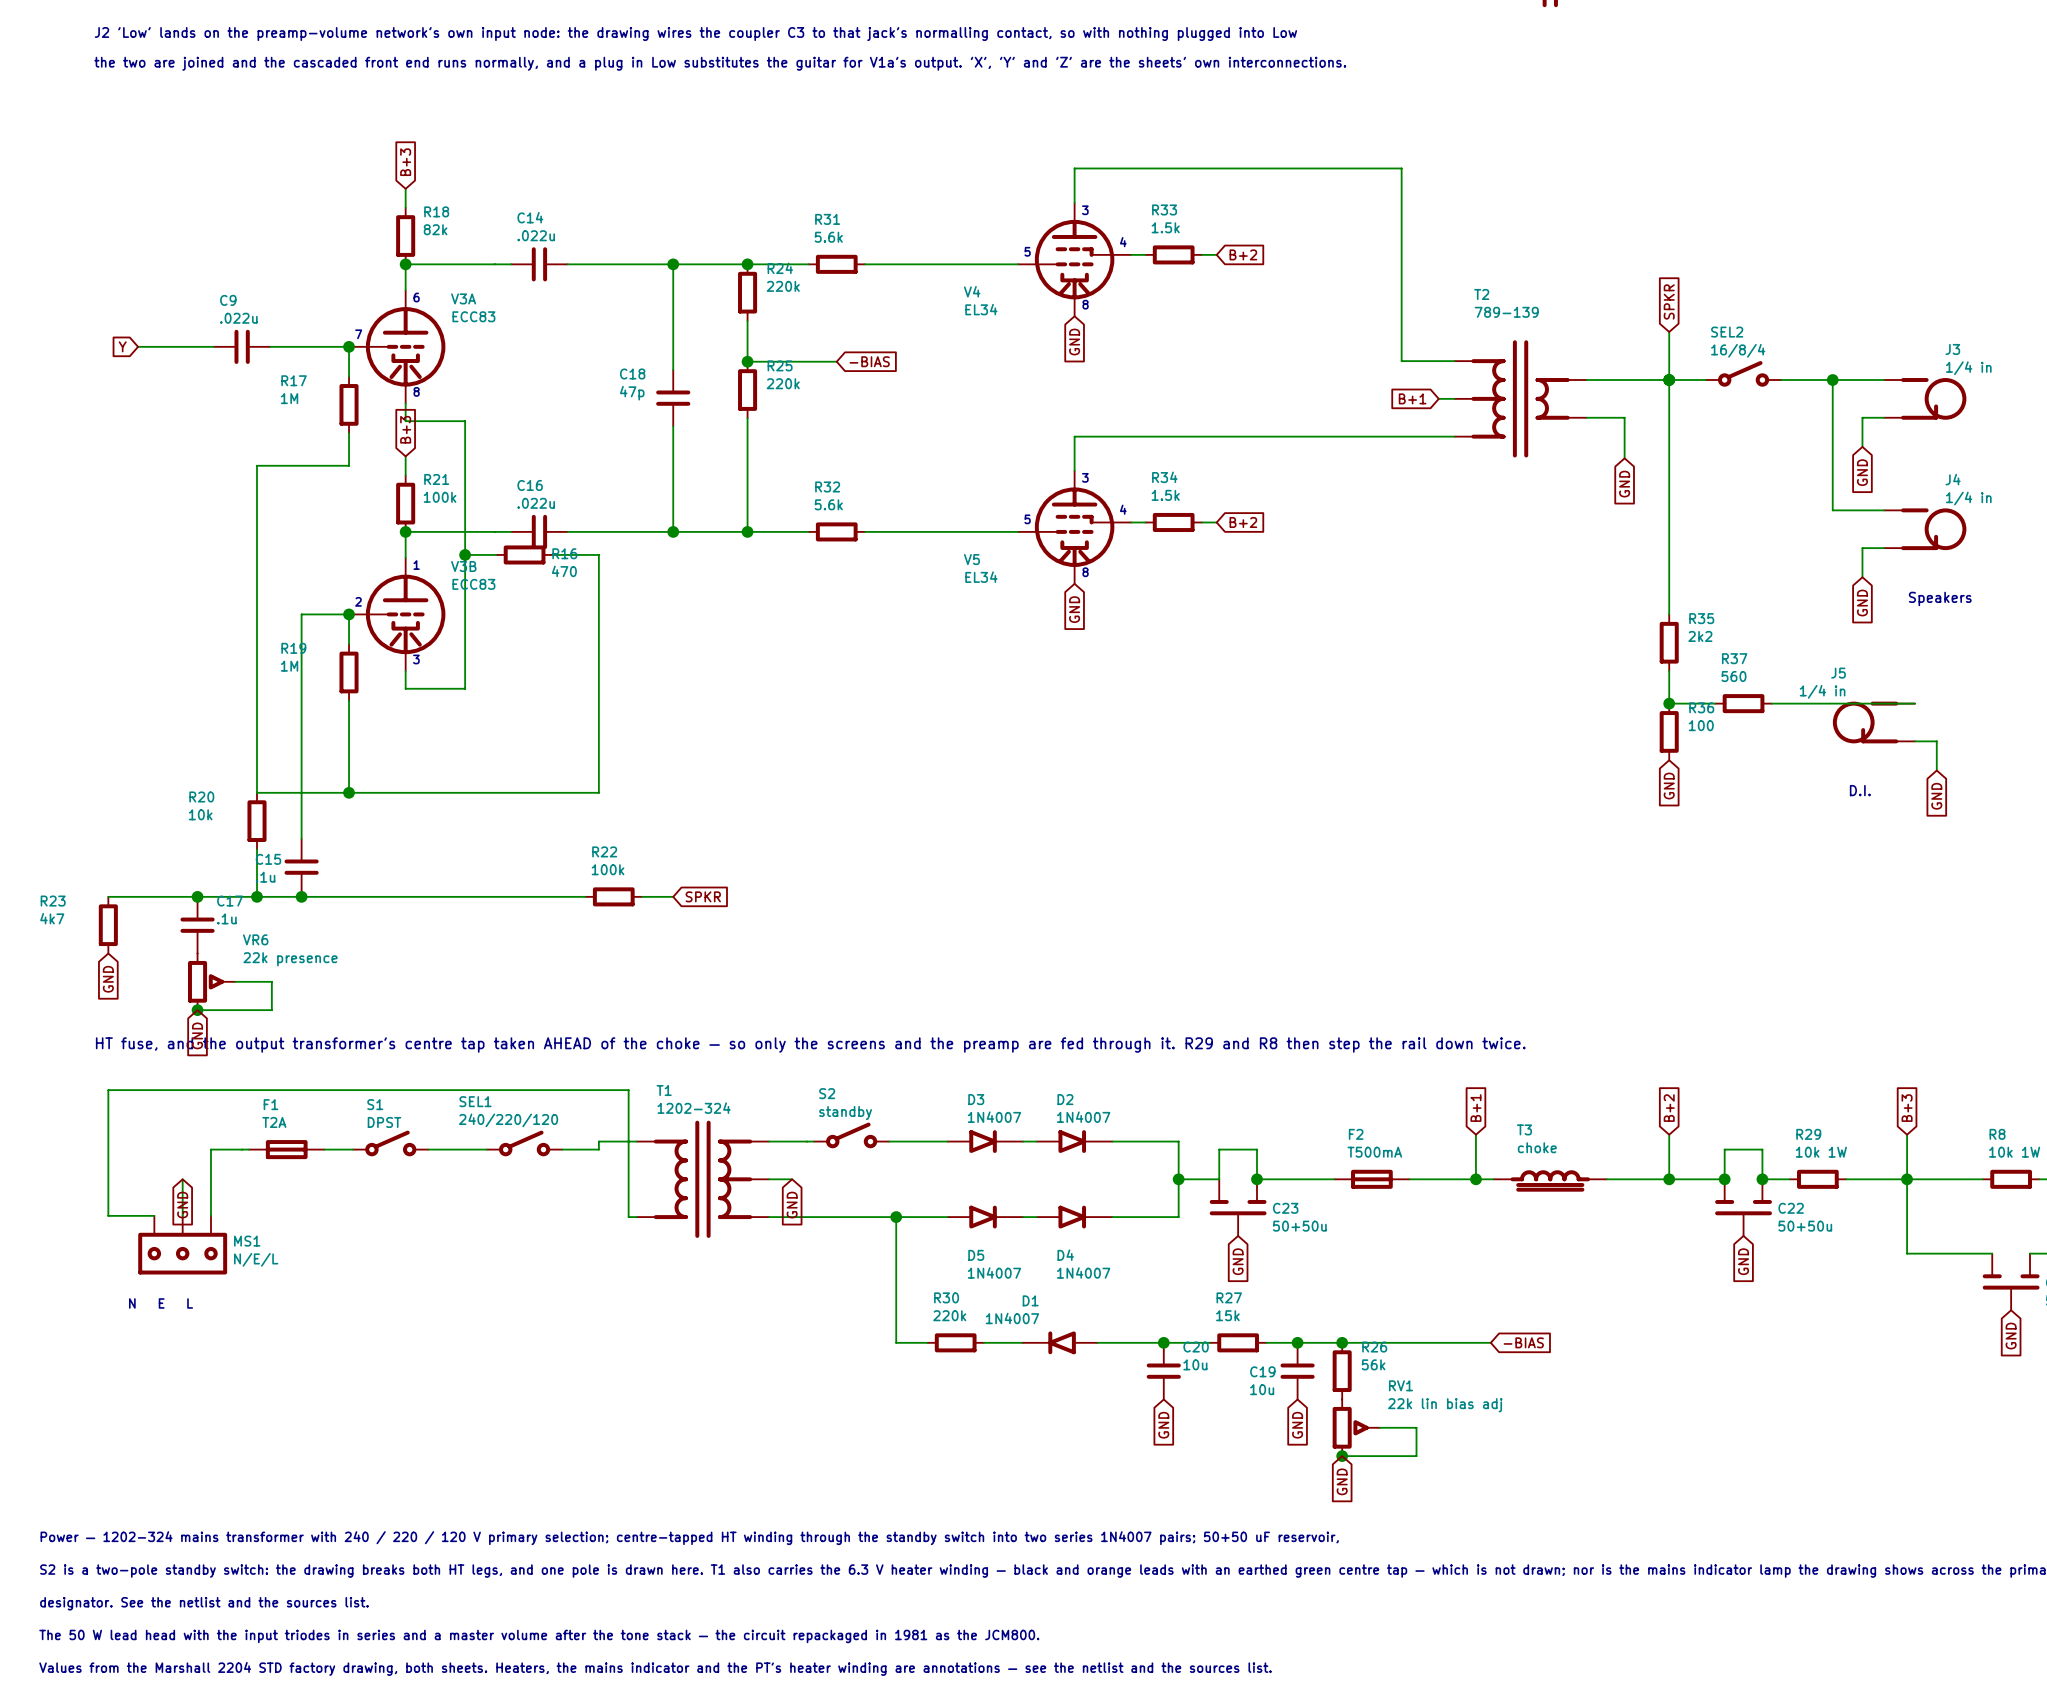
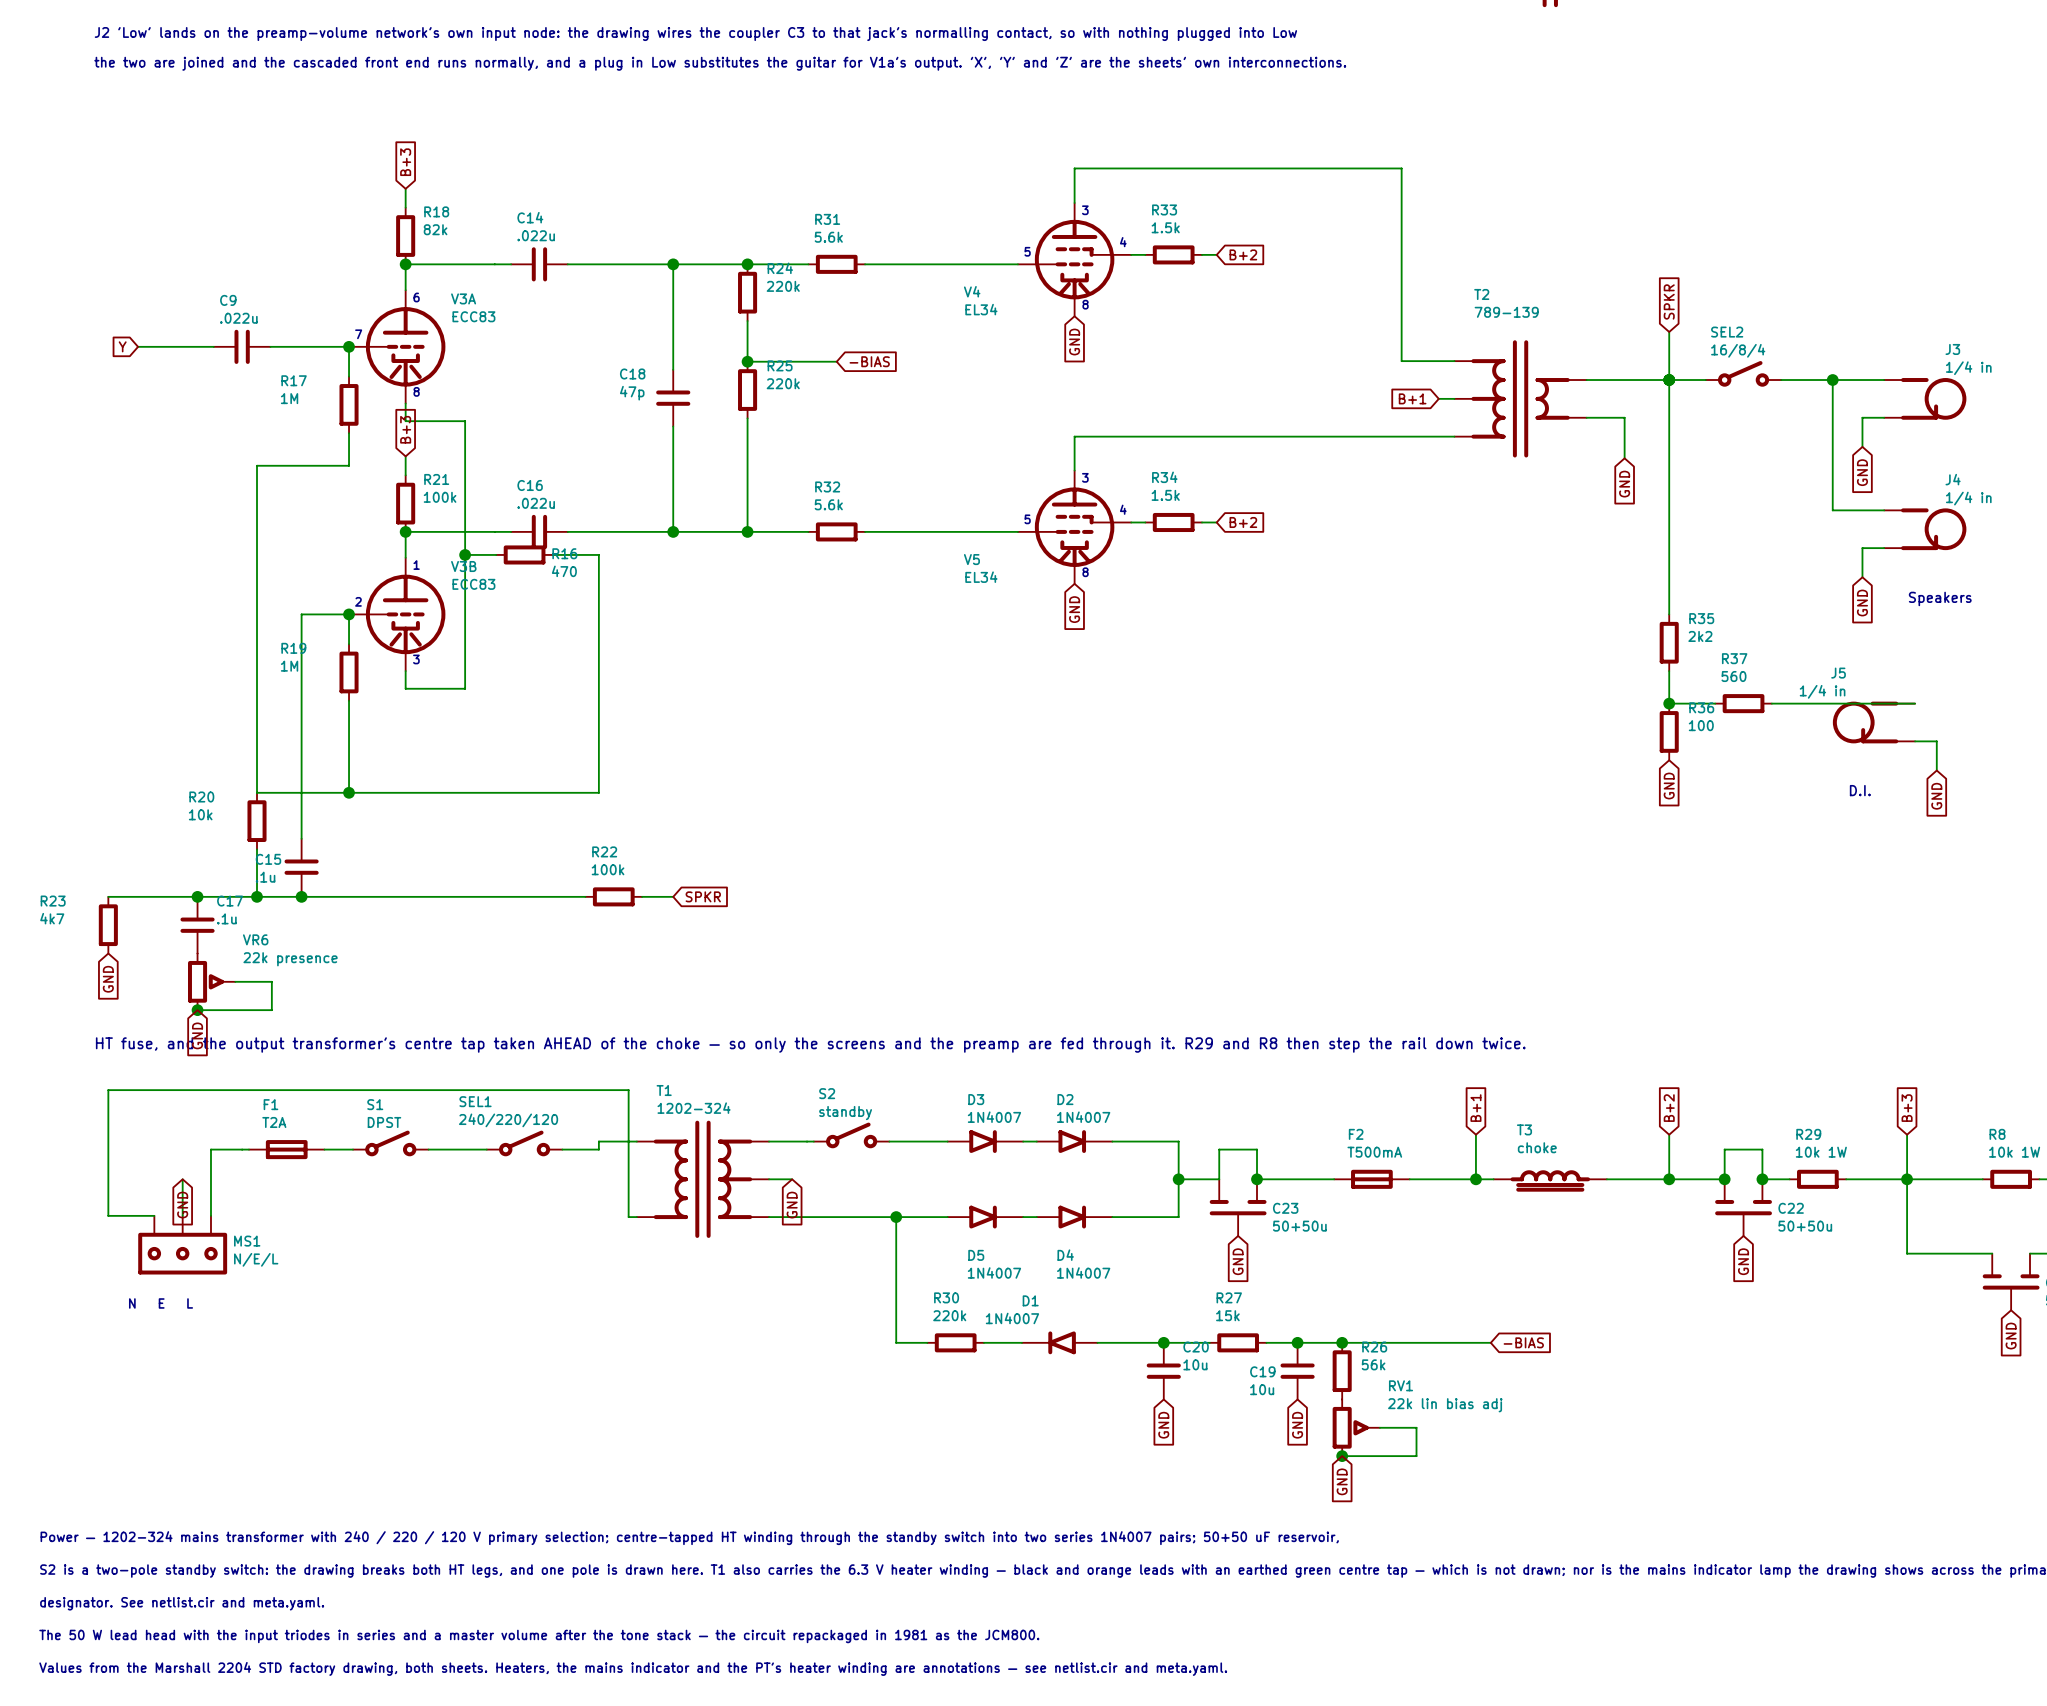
text: designator. See the netlist and the sources list. (204, 1603) -> designator. See netlist.cir and meta.yaml. (182, 1603)
text: Values from the Marshall 2204 STD factory drawing, both sheets. Heaters, the mains indicator and the PT's heater winding are annotations — see the netlist and the sources list. (655, 1668) -> Values from the Marshall 2204 STD factory drawing, both sheets. Heaters, the mains indicator and the PT's heater winding are annotations — see netlist.cir and meta.yaml. (633, 1668)

